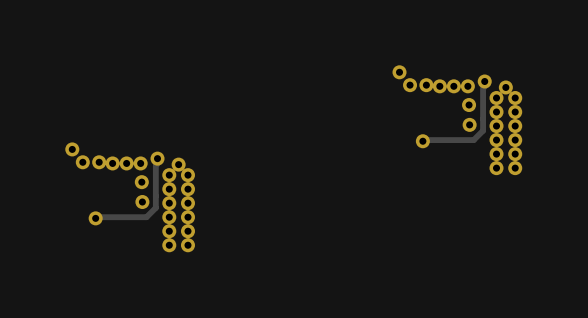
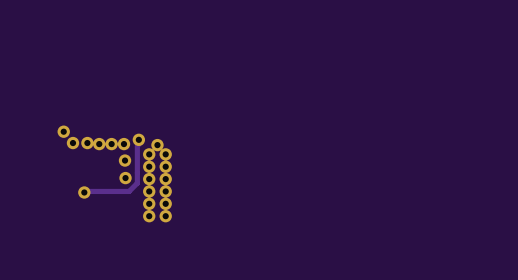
via: (399, 72) -> none
via: (484, 81) -> none
via: (410, 85) -> none
via: (426, 85) -> none
via: (439, 86) -> none
via: (453, 86) -> none
via: (467, 86) -> none
via: (505, 87) -> none
track: (483, 88) (483, 130) (473, 140) (422, 141) -> none
via: (496, 98) -> none
via: (515, 98) -> none
via: (469, 105) -> none
via: (496, 112) -> none
via: (515, 112) -> none
via: (469, 124) -> none
via: (496, 126) -> none
via: (515, 126) -> none
via: (496, 140) -> none
via: (515, 140) -> none
via: (422, 141) -> none
via: (496, 154) -> none
via: (515, 154) -> none
via: (496, 168) -> none
via: (515, 168) -> none

